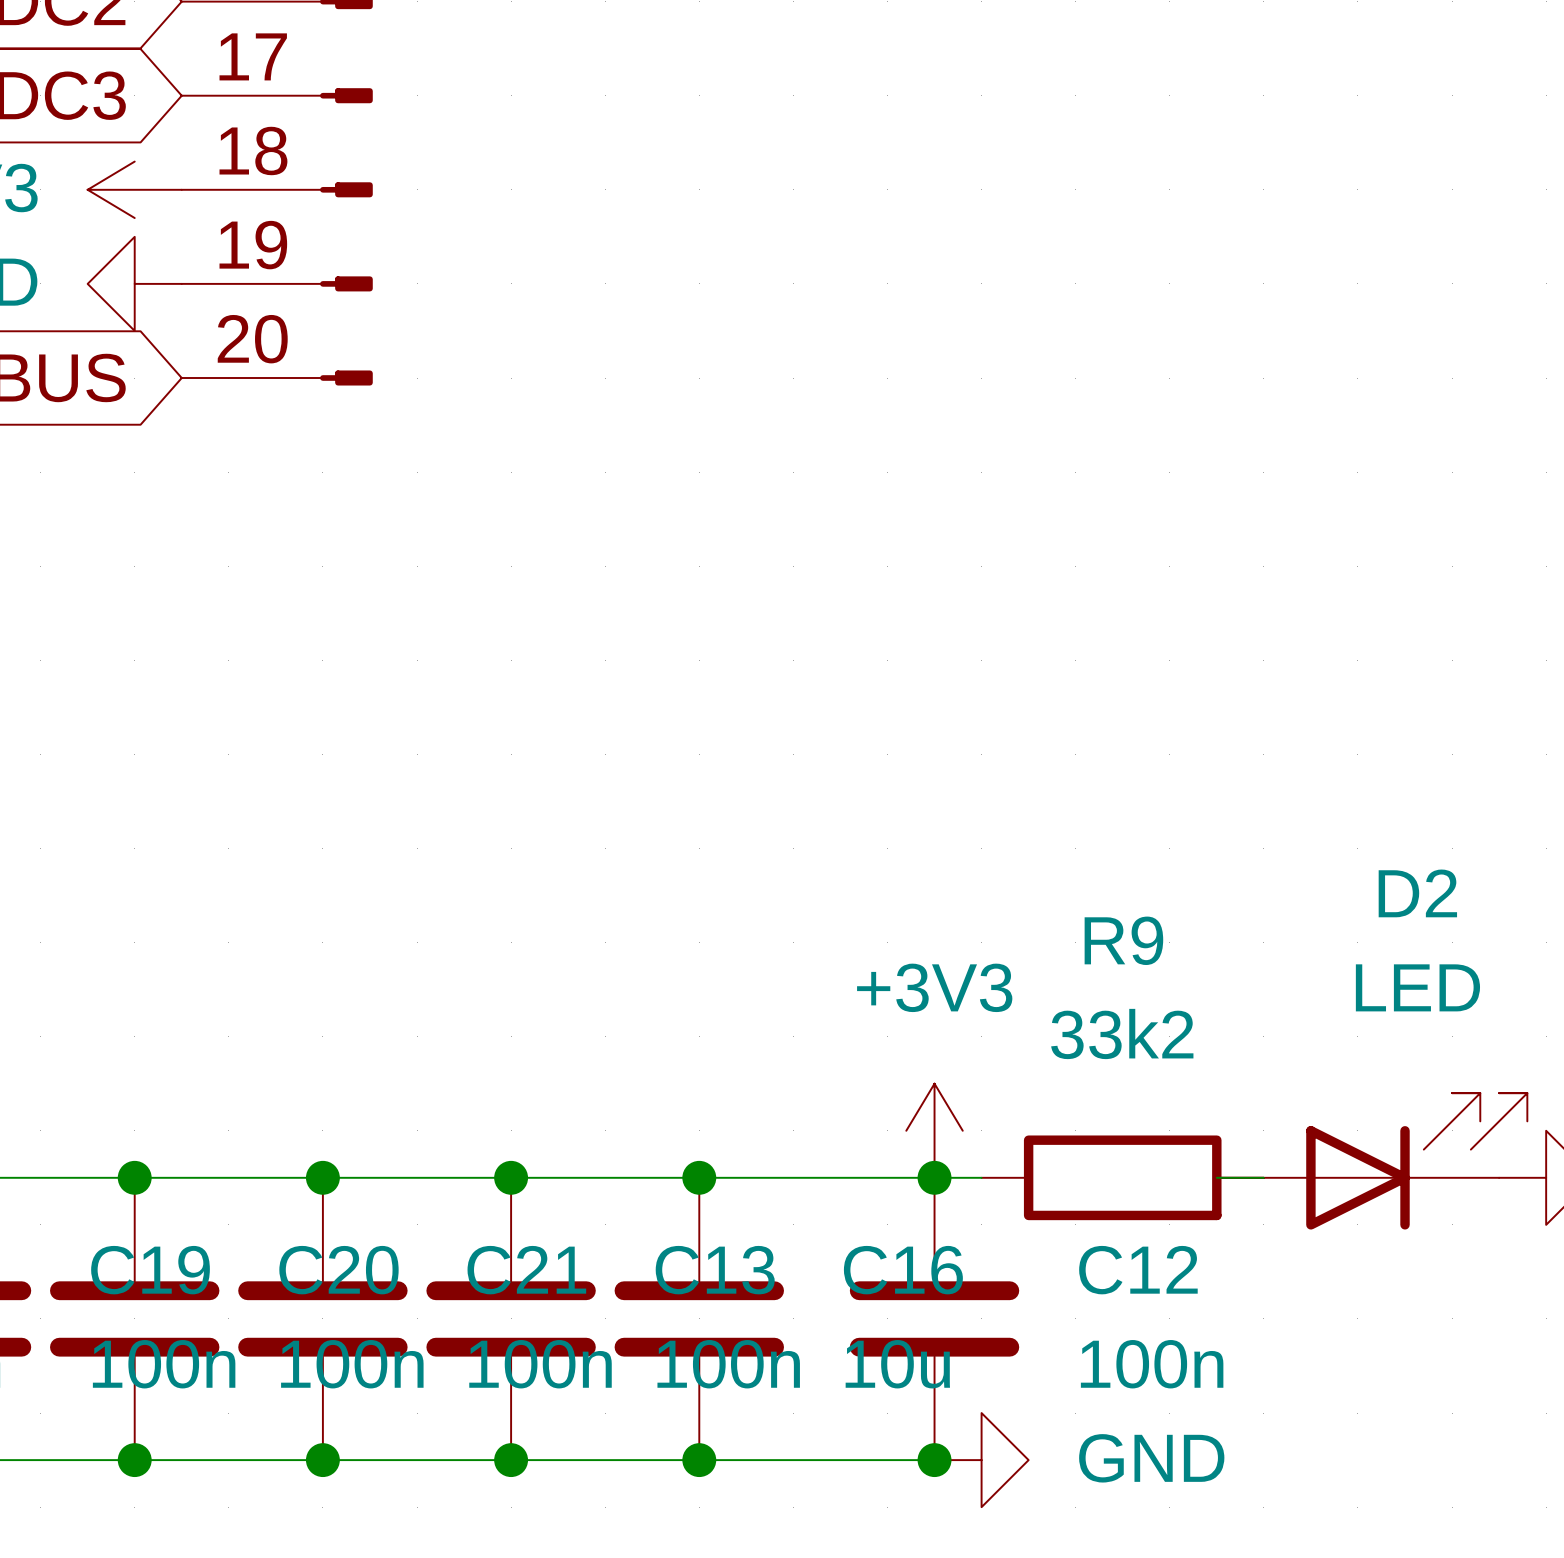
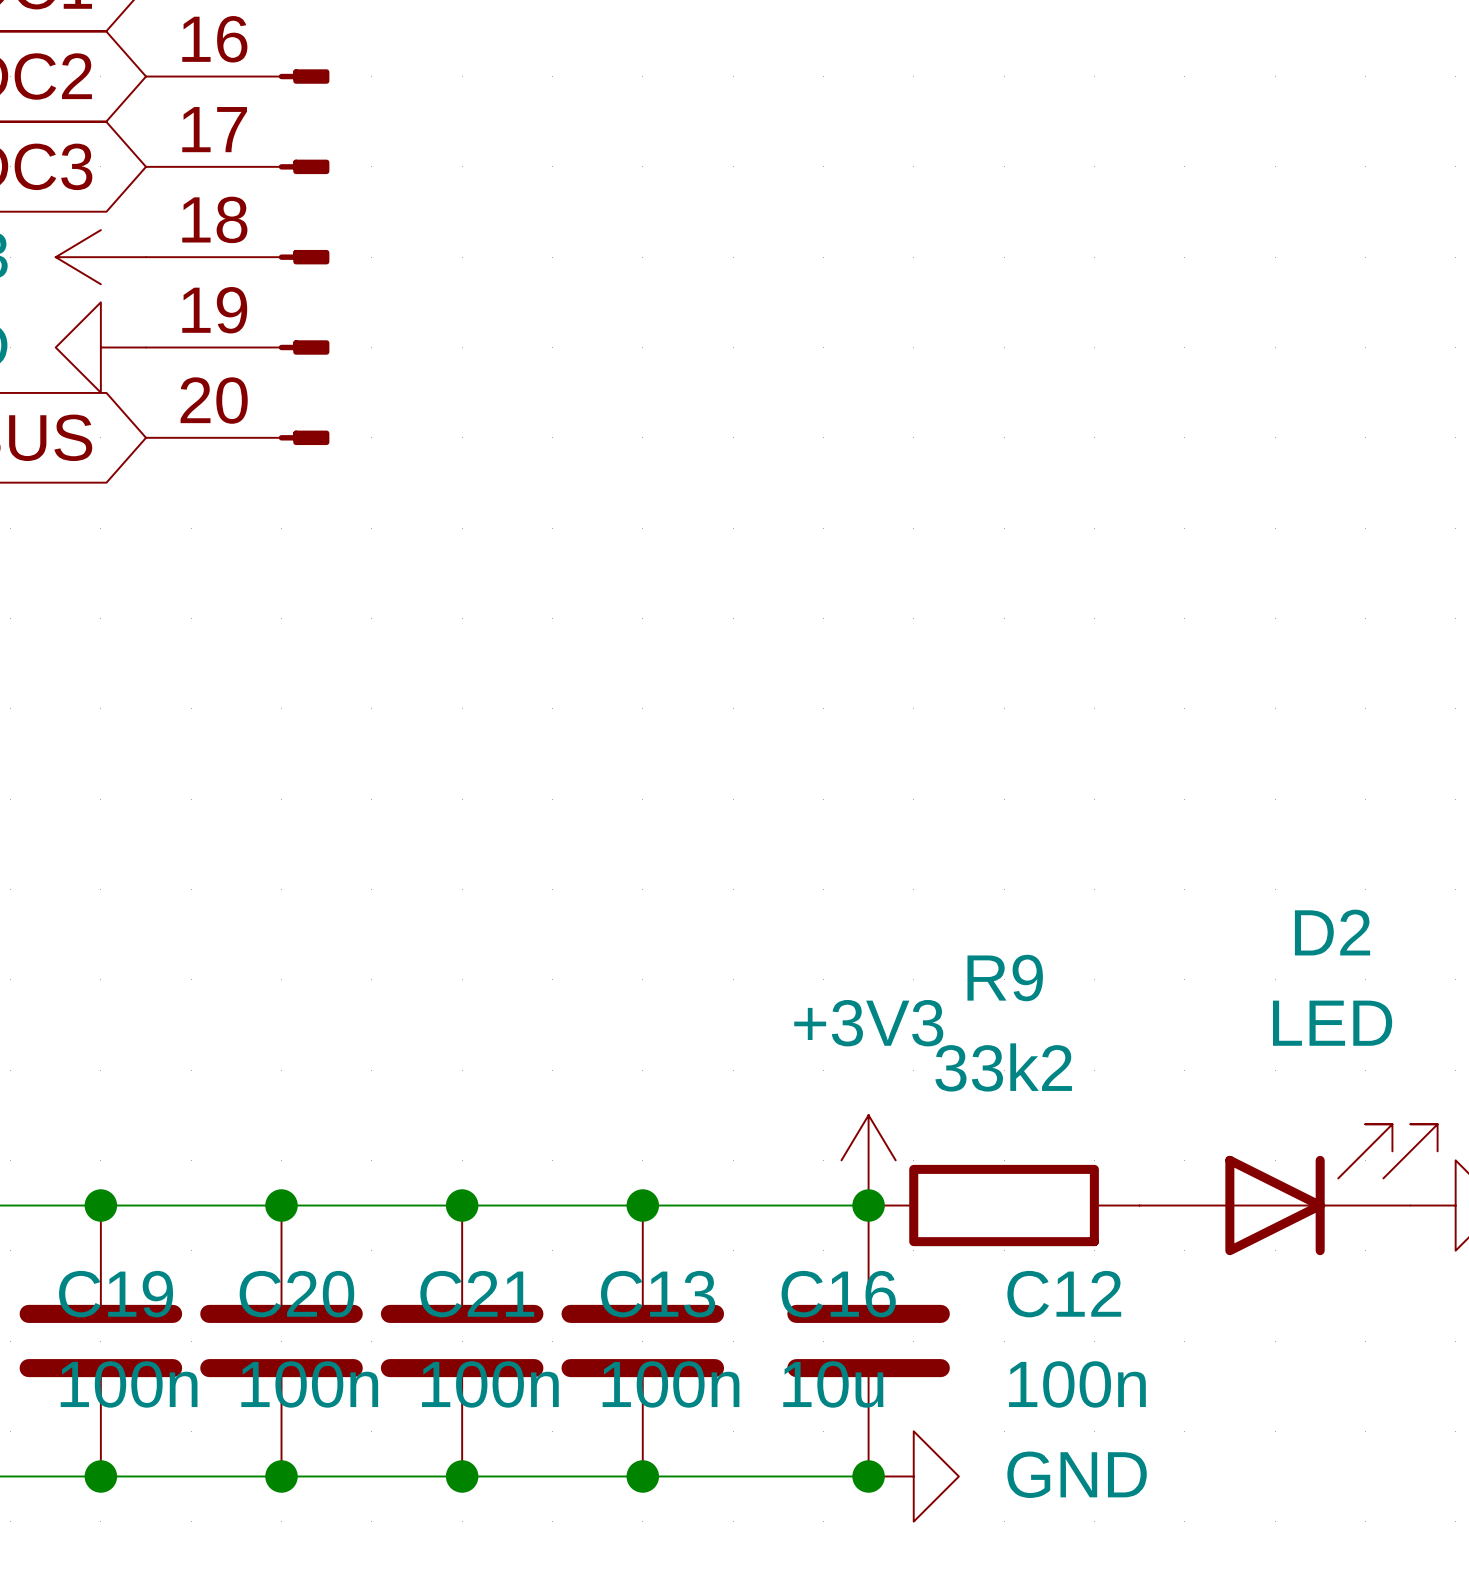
R9 position: (1122, 1177) -> (1004, 1205)

